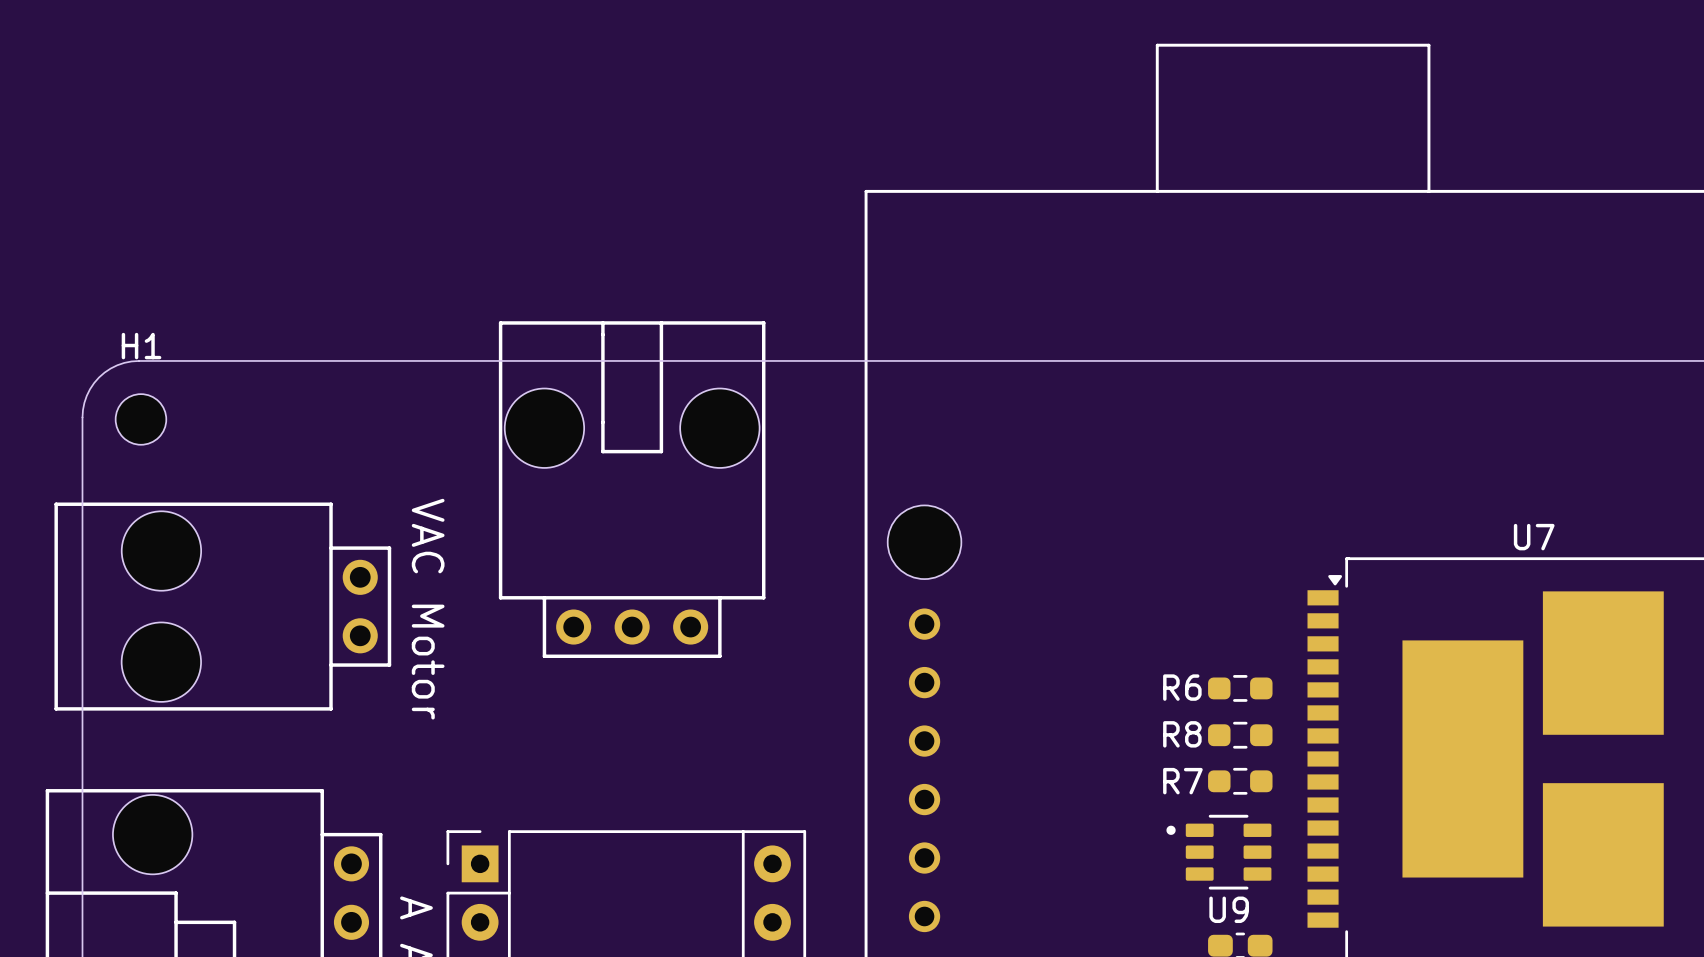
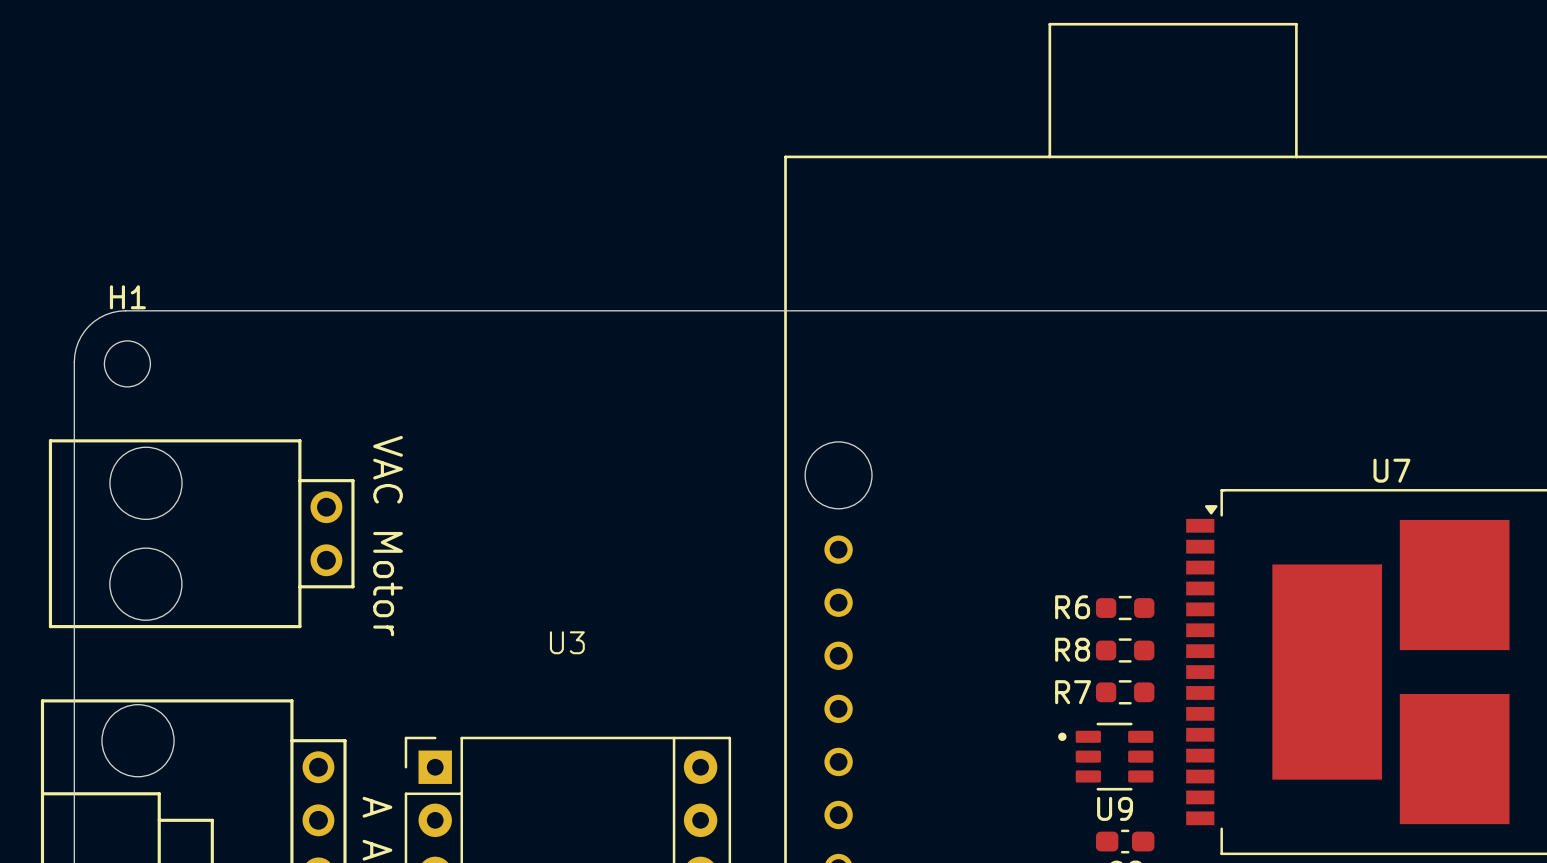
part: (632, 489) -> none
U3 name: none -> U3 (567, 642)

